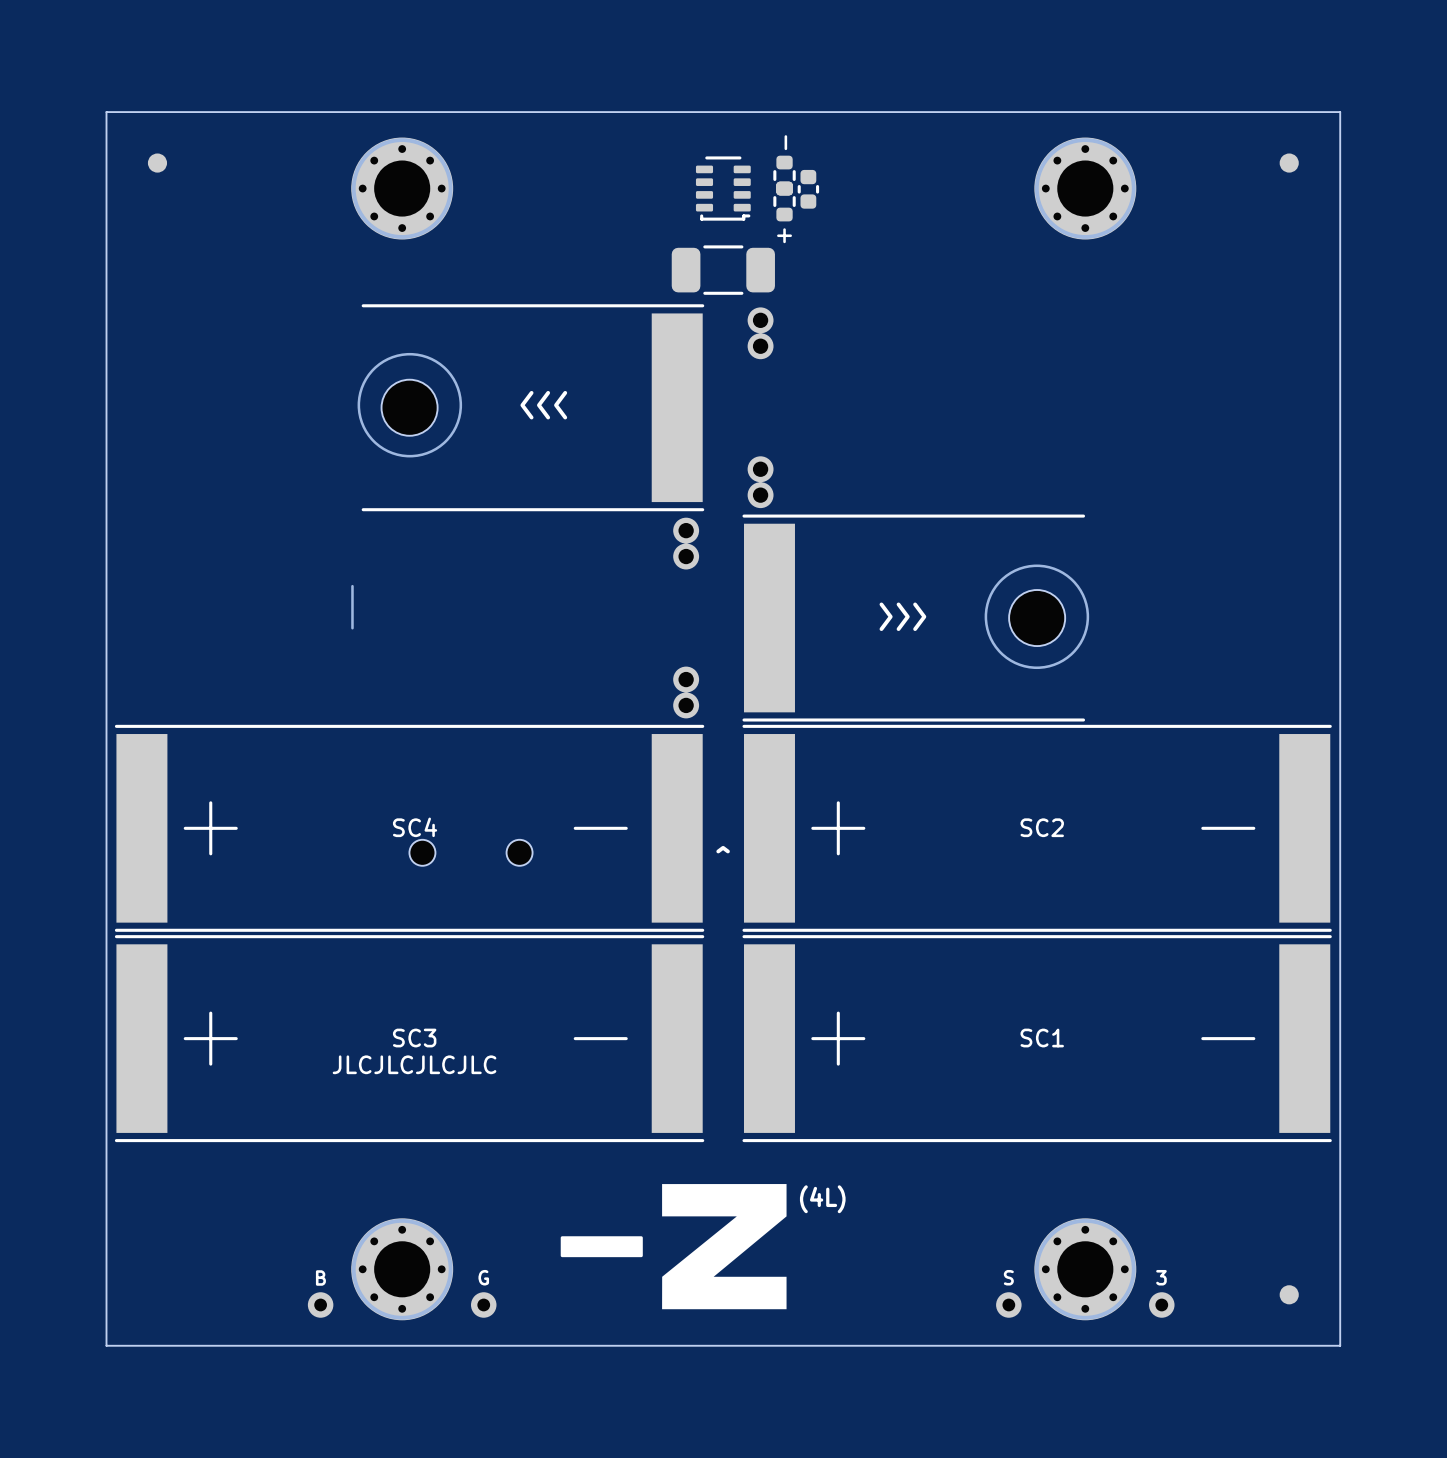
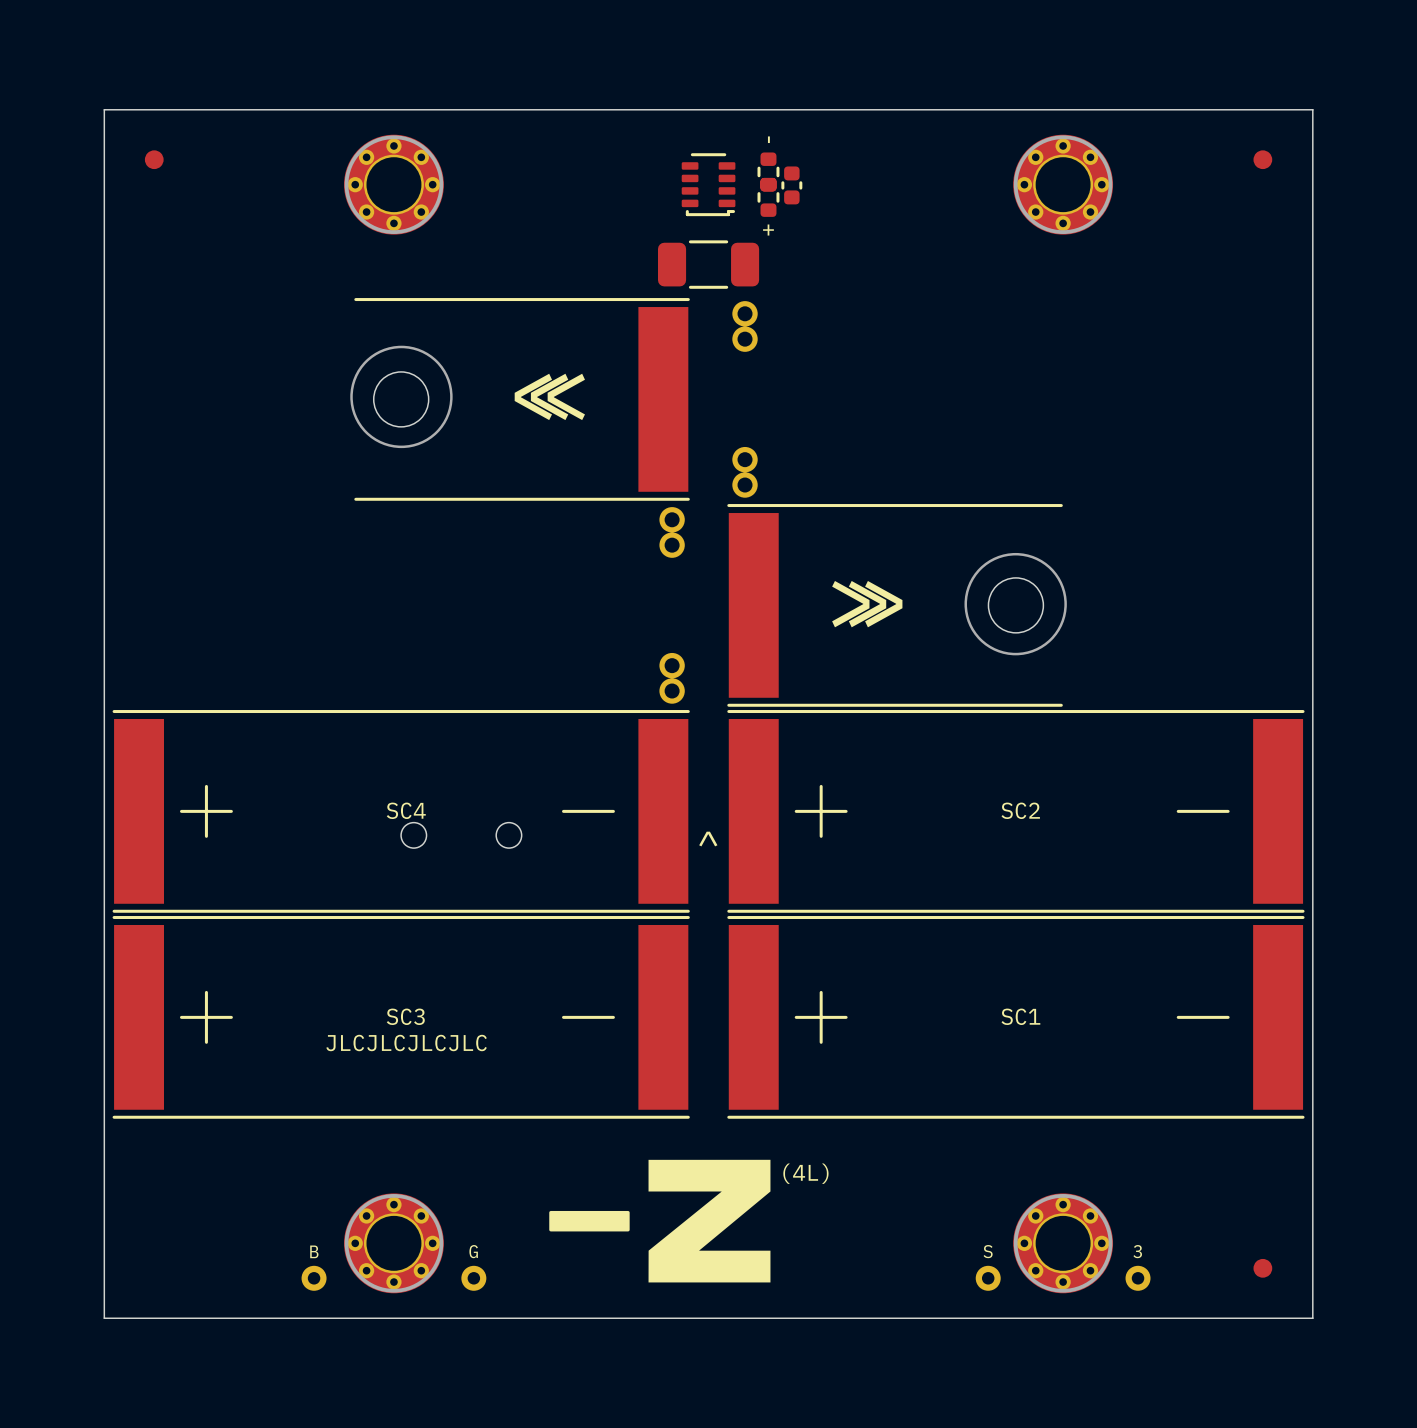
line: (352, 586) (352, 628) -> none

